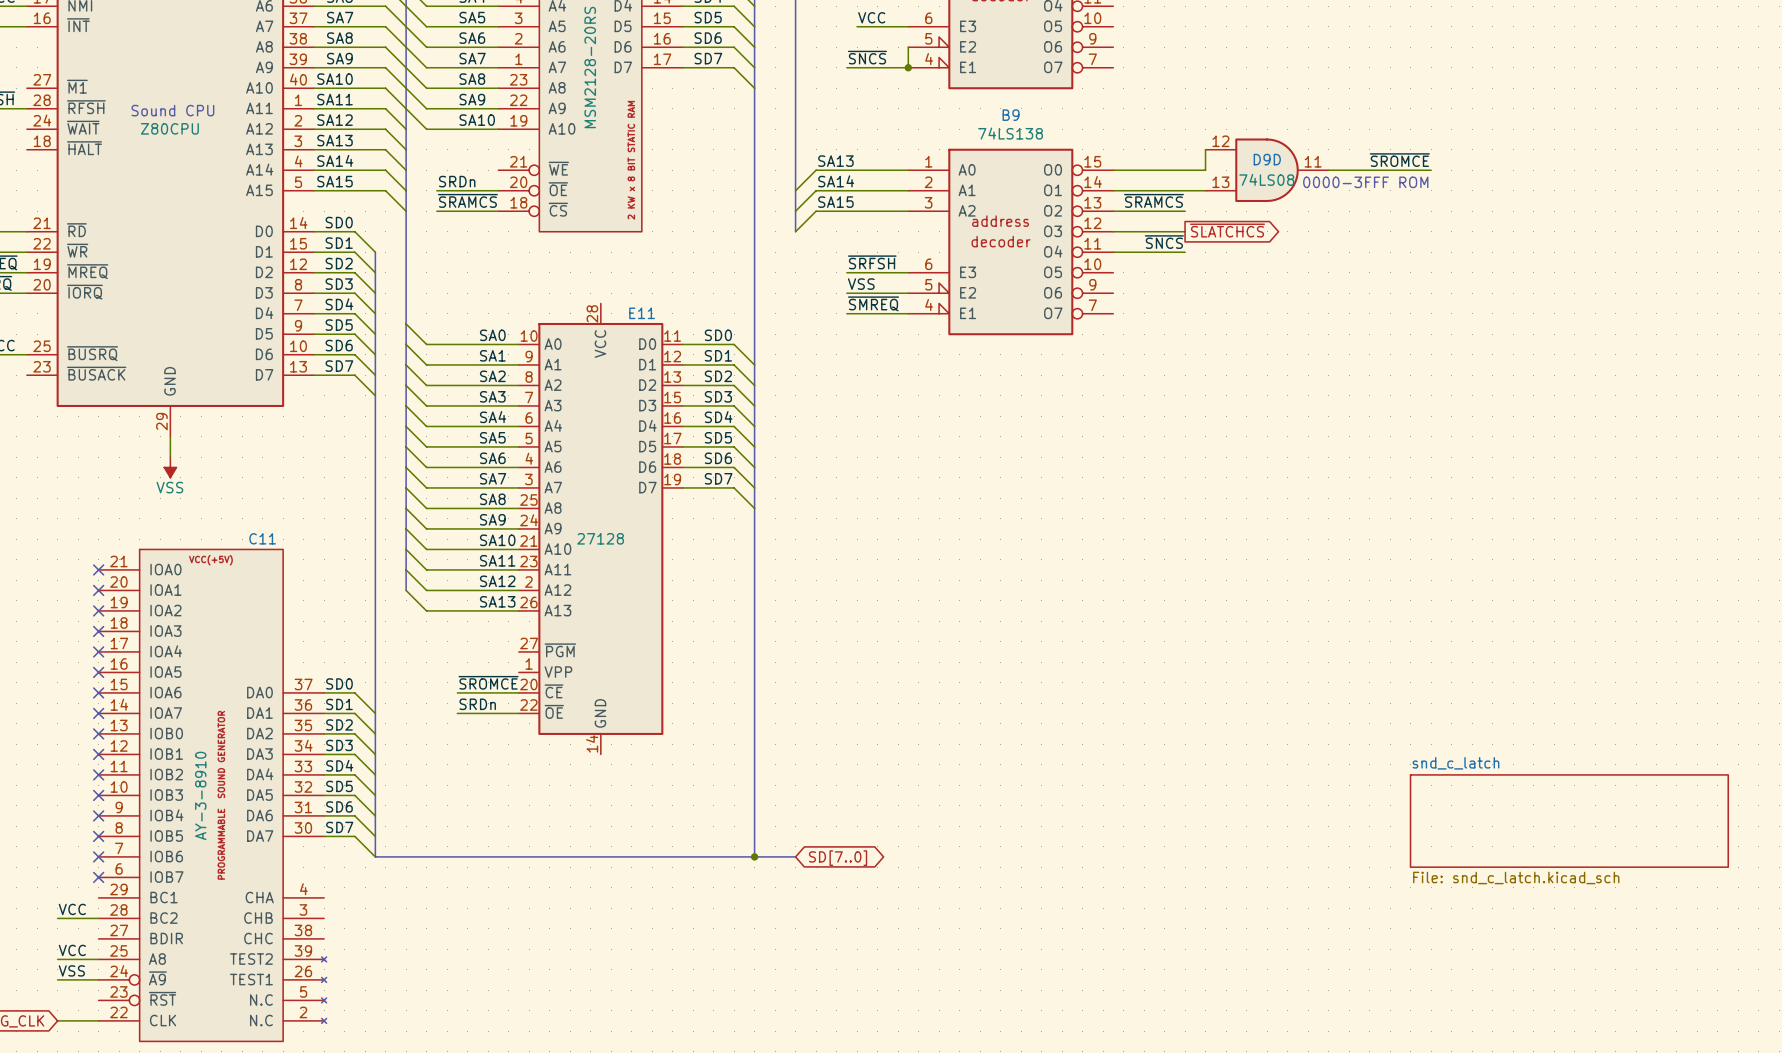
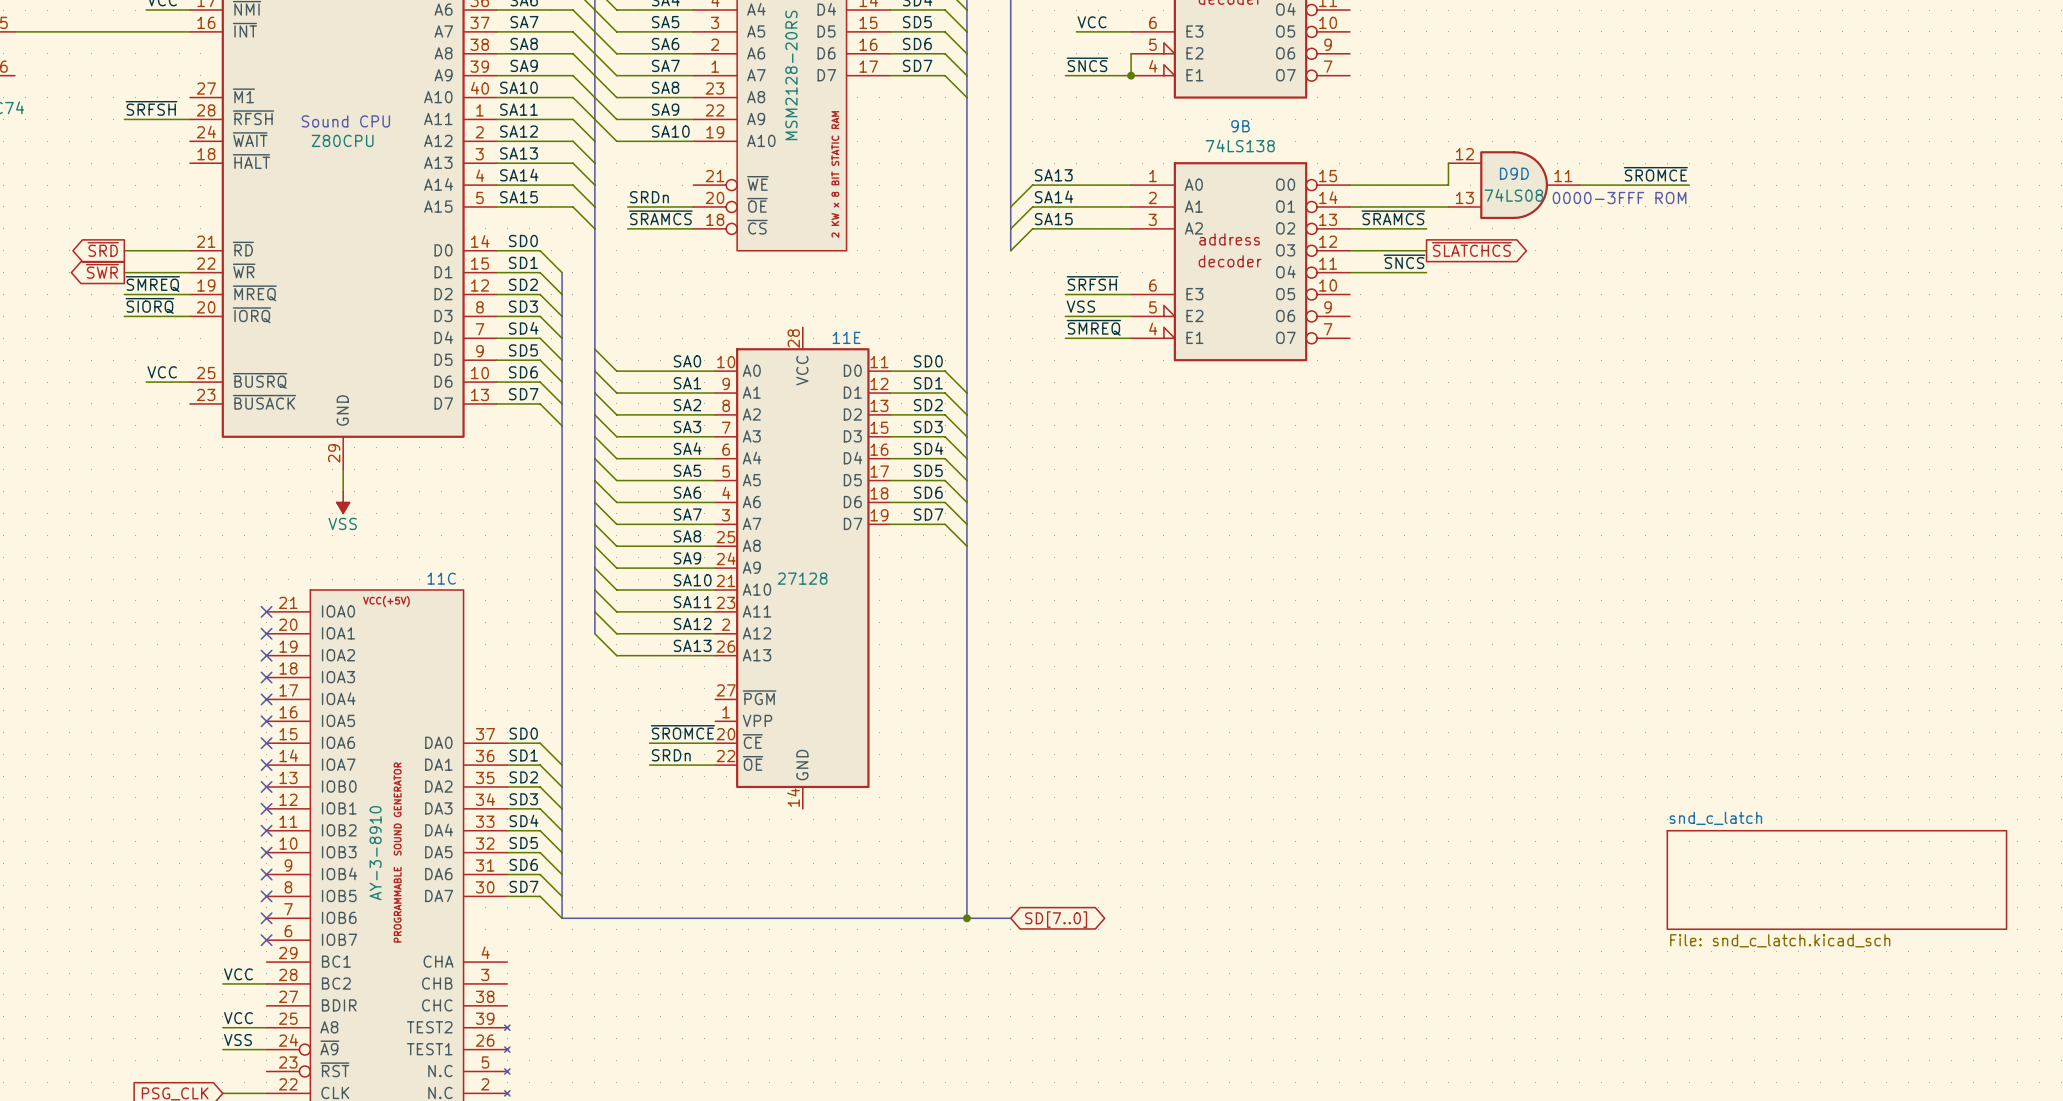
B9 name: B9 (1011, 115) -> 9B (1240, 126)
E11 name: E11 (642, 313) -> 11E (846, 337)
C11 name: C11 (262, 538) -> 11C (441, 578)

